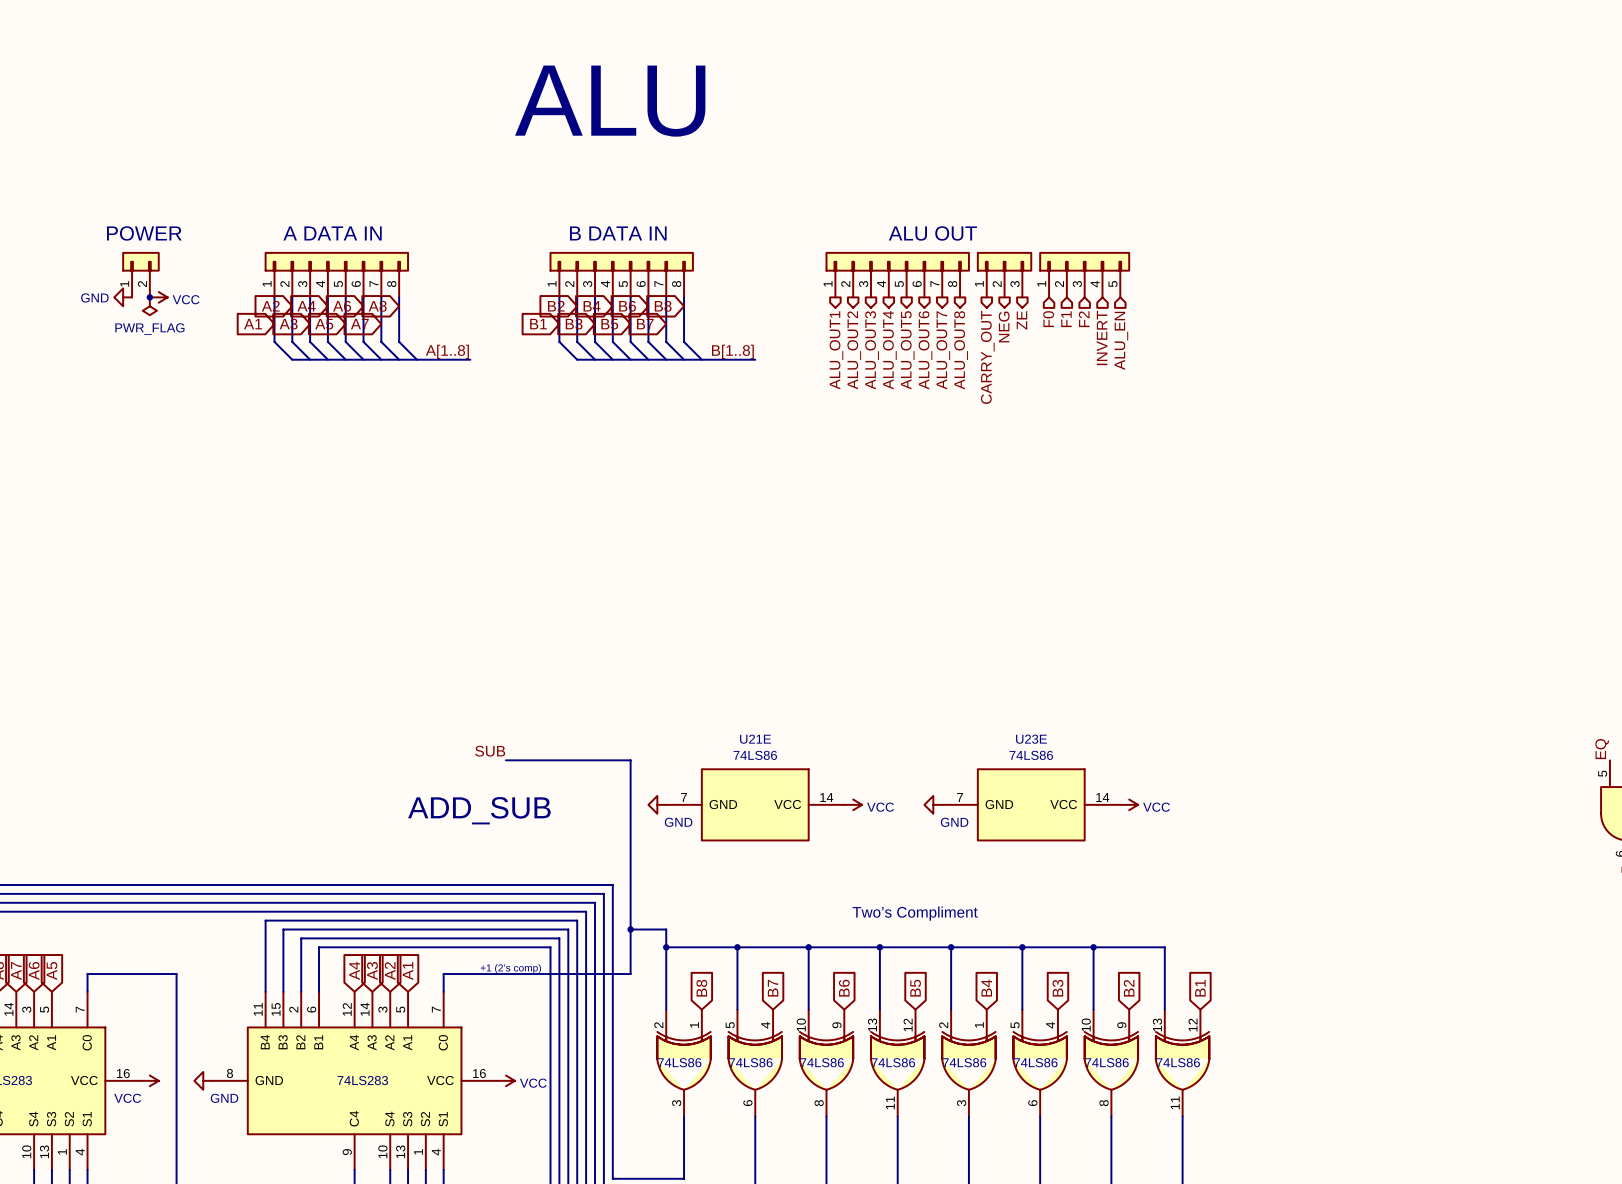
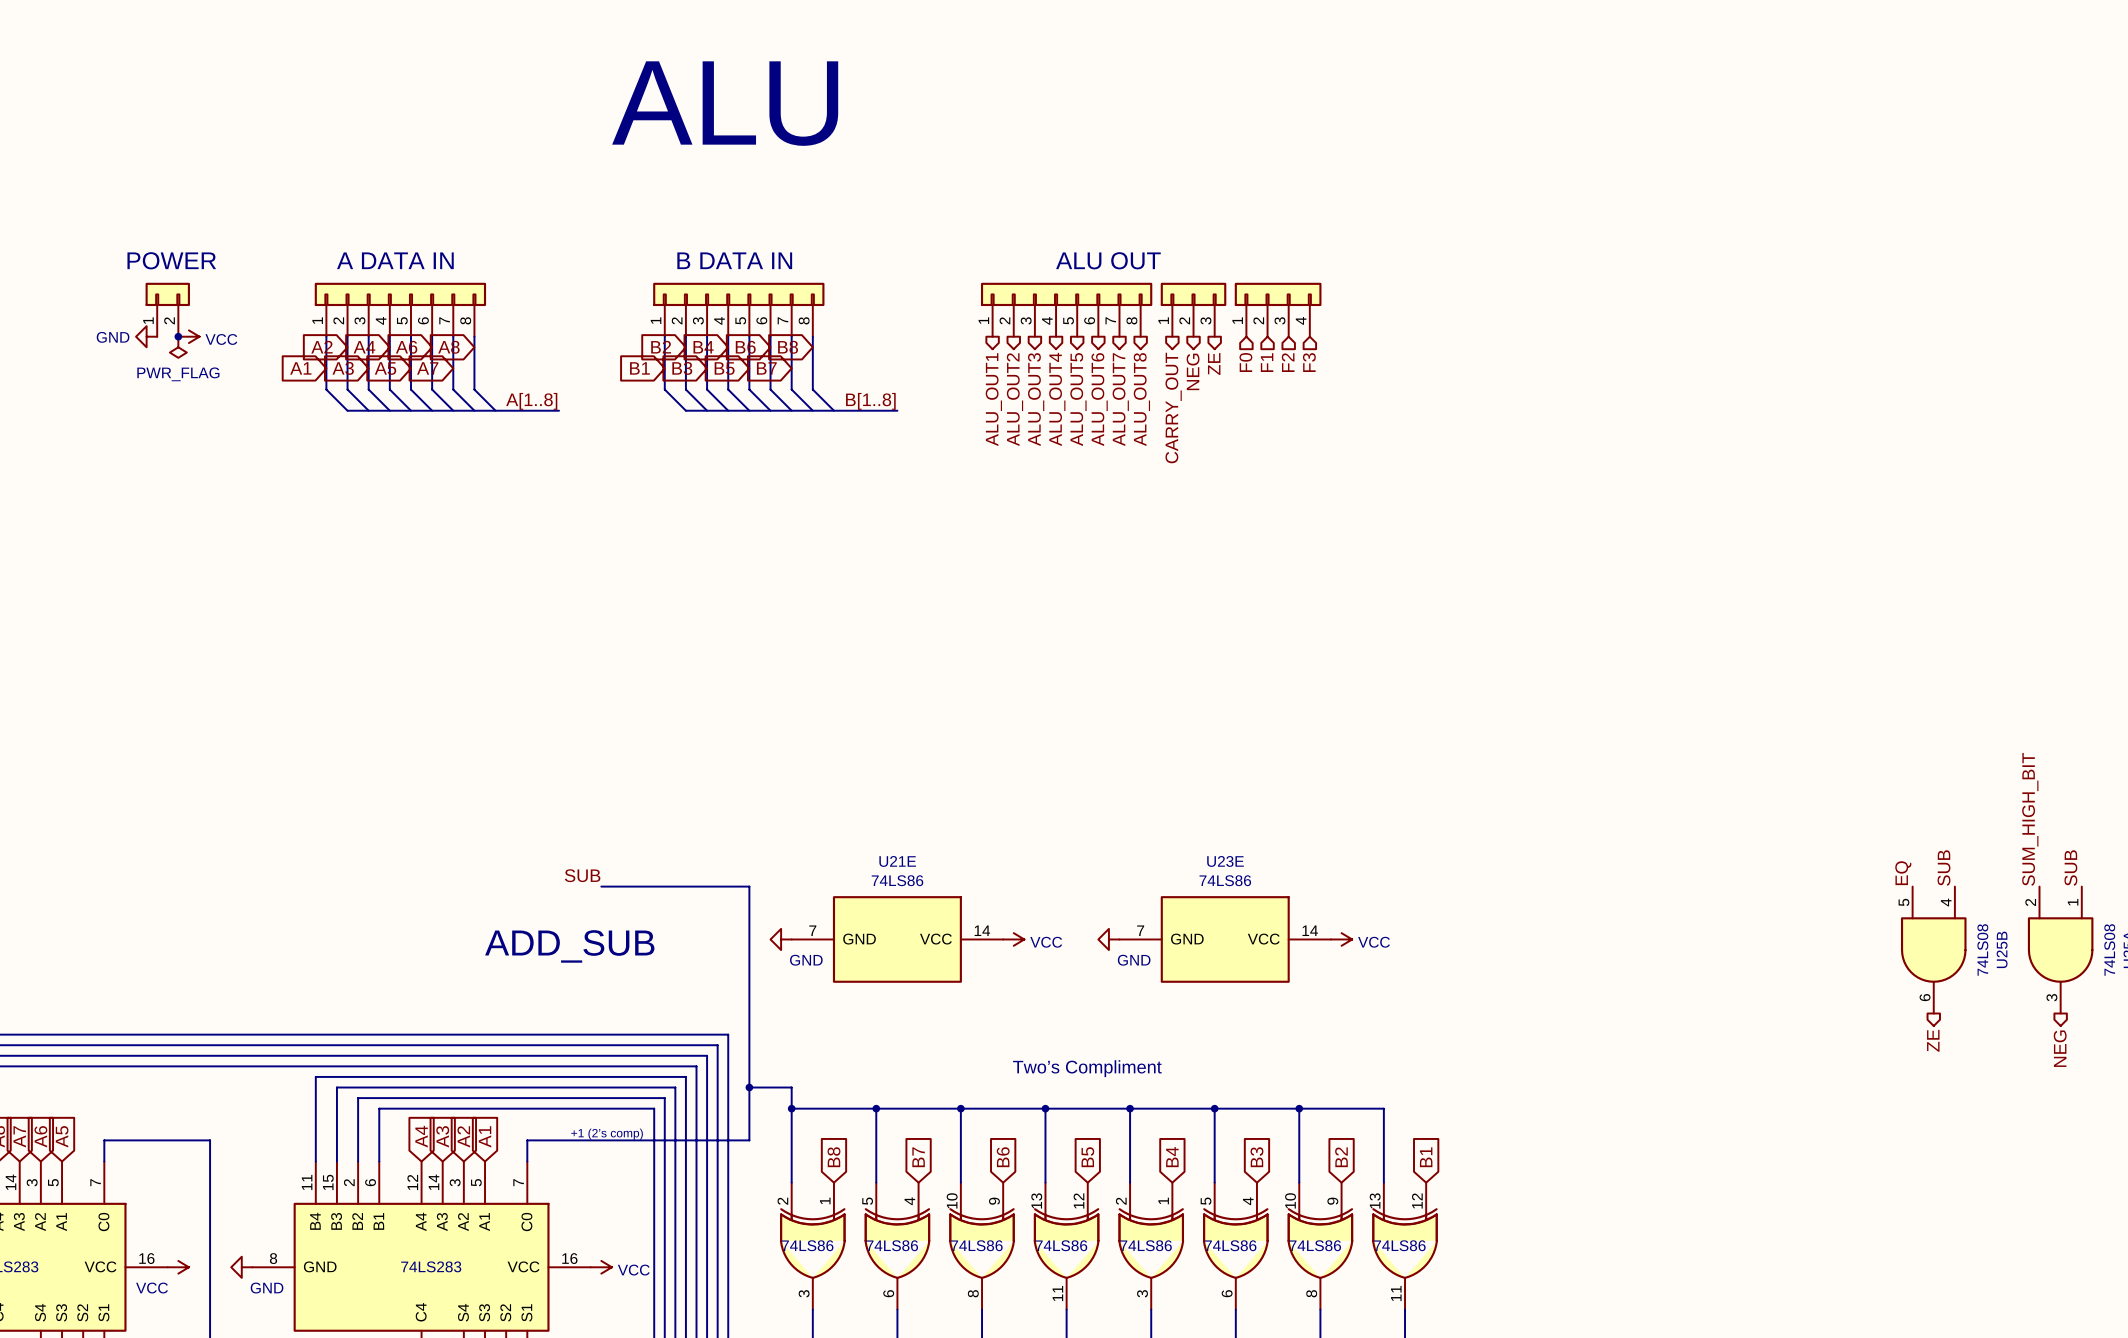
part: none -> (1278, 309)
part: (1084, 274) -> none
hierarchical label: INVERT (1102, 338) -> F3 (1309, 362)
hierarchical label: ALU_EN (1121, 340) -> none

